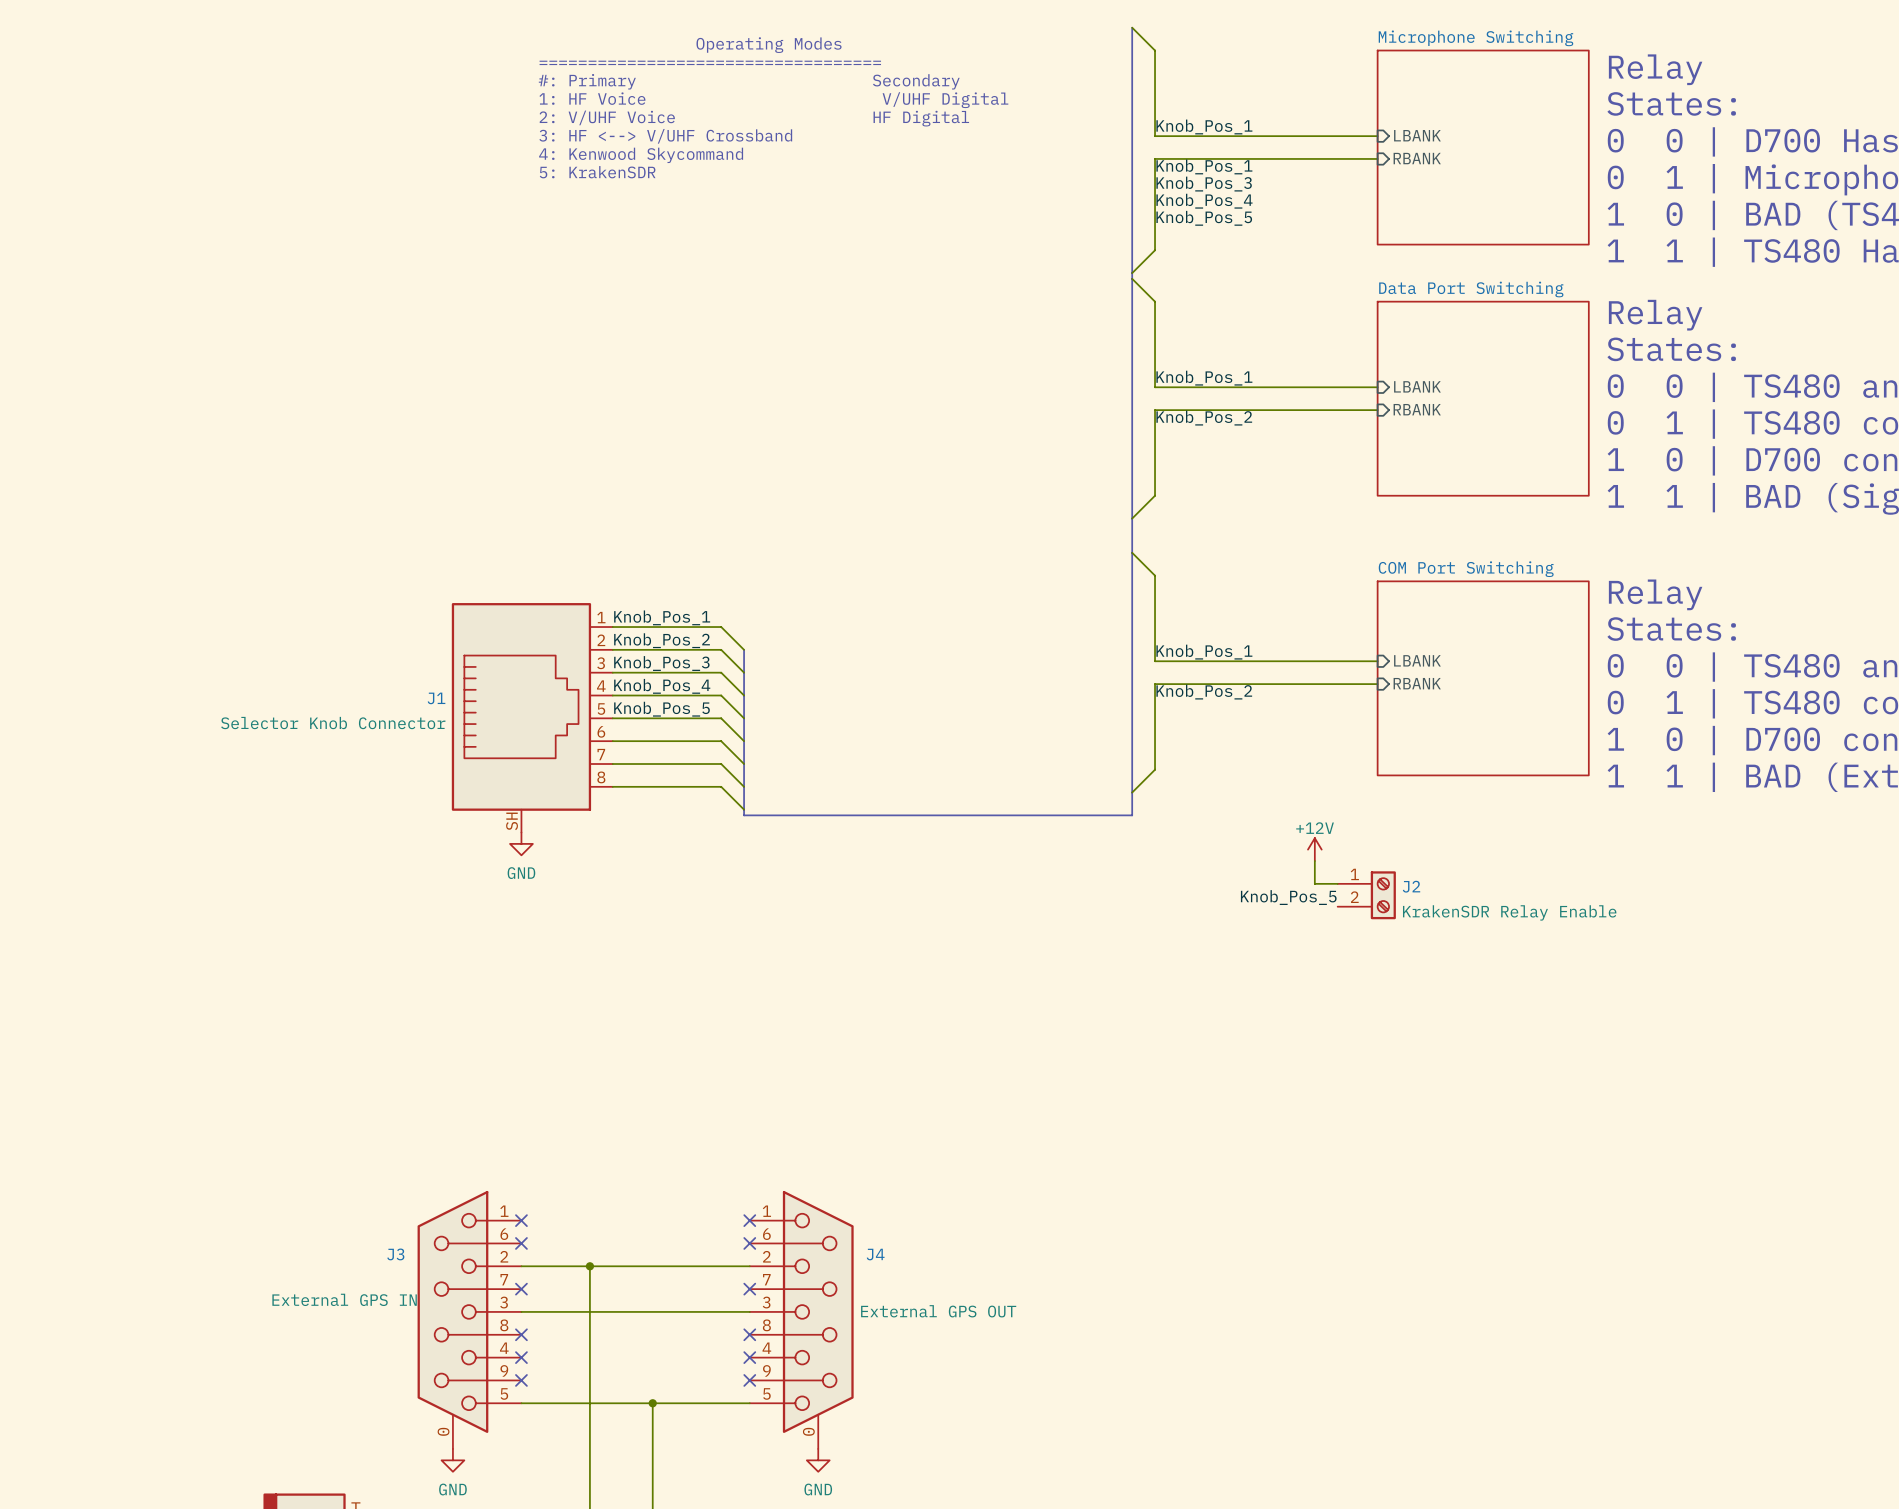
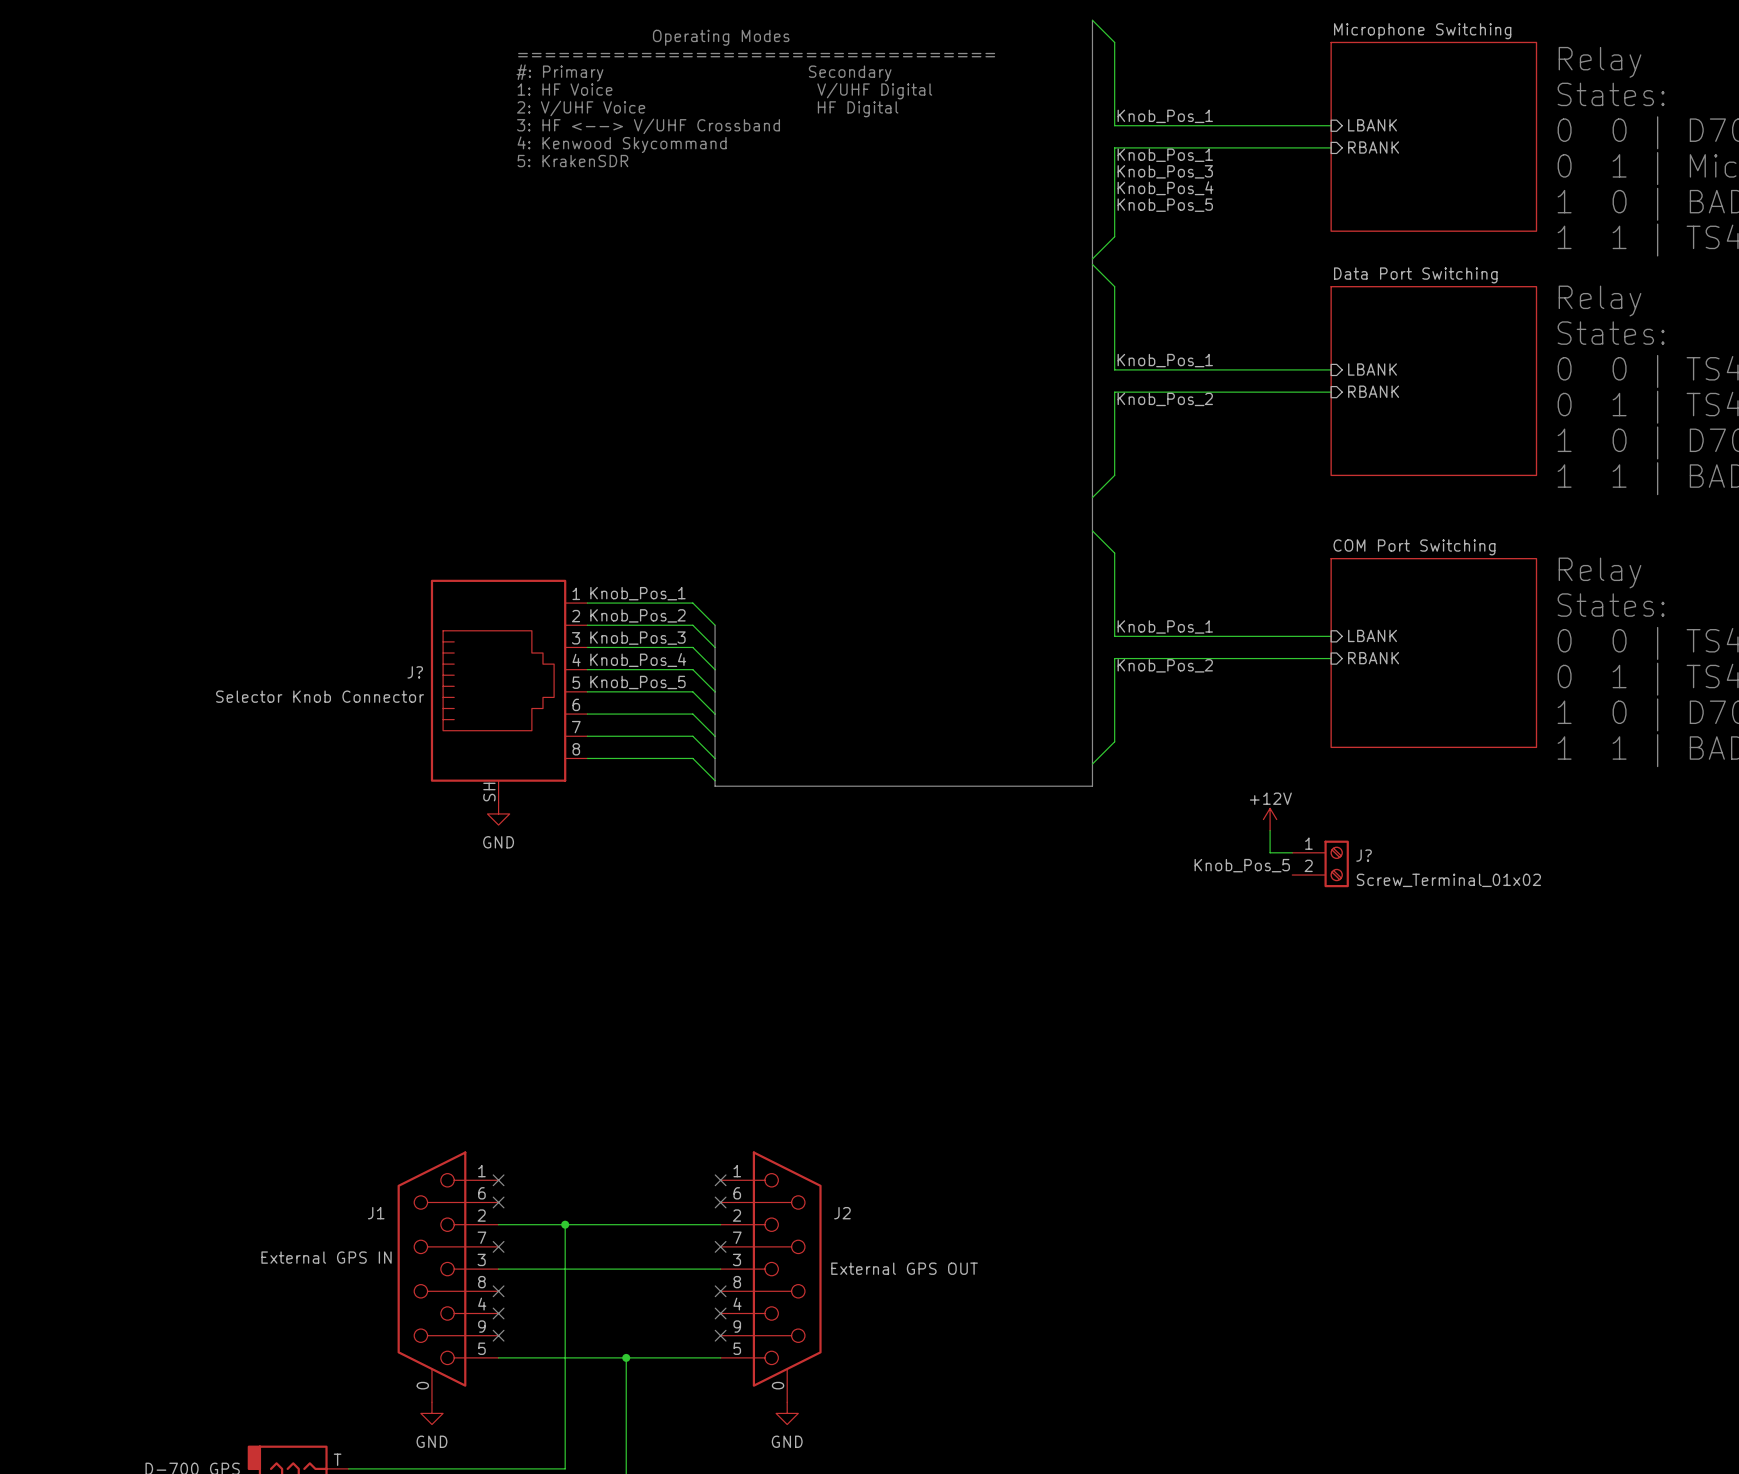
J1 name: J1 (436, 698) -> J? (415, 672)
J2 name: J2 (1411, 886) -> J? (1364, 855)
J2 value: KrakenSDR Relay Enable (1509, 912) -> Screw_Terminal_01x02 (1448, 880)
J3 name: J3 (395, 1254) -> J1 (376, 1213)
J4 name: J4 (875, 1254) -> J2 (842, 1213)

